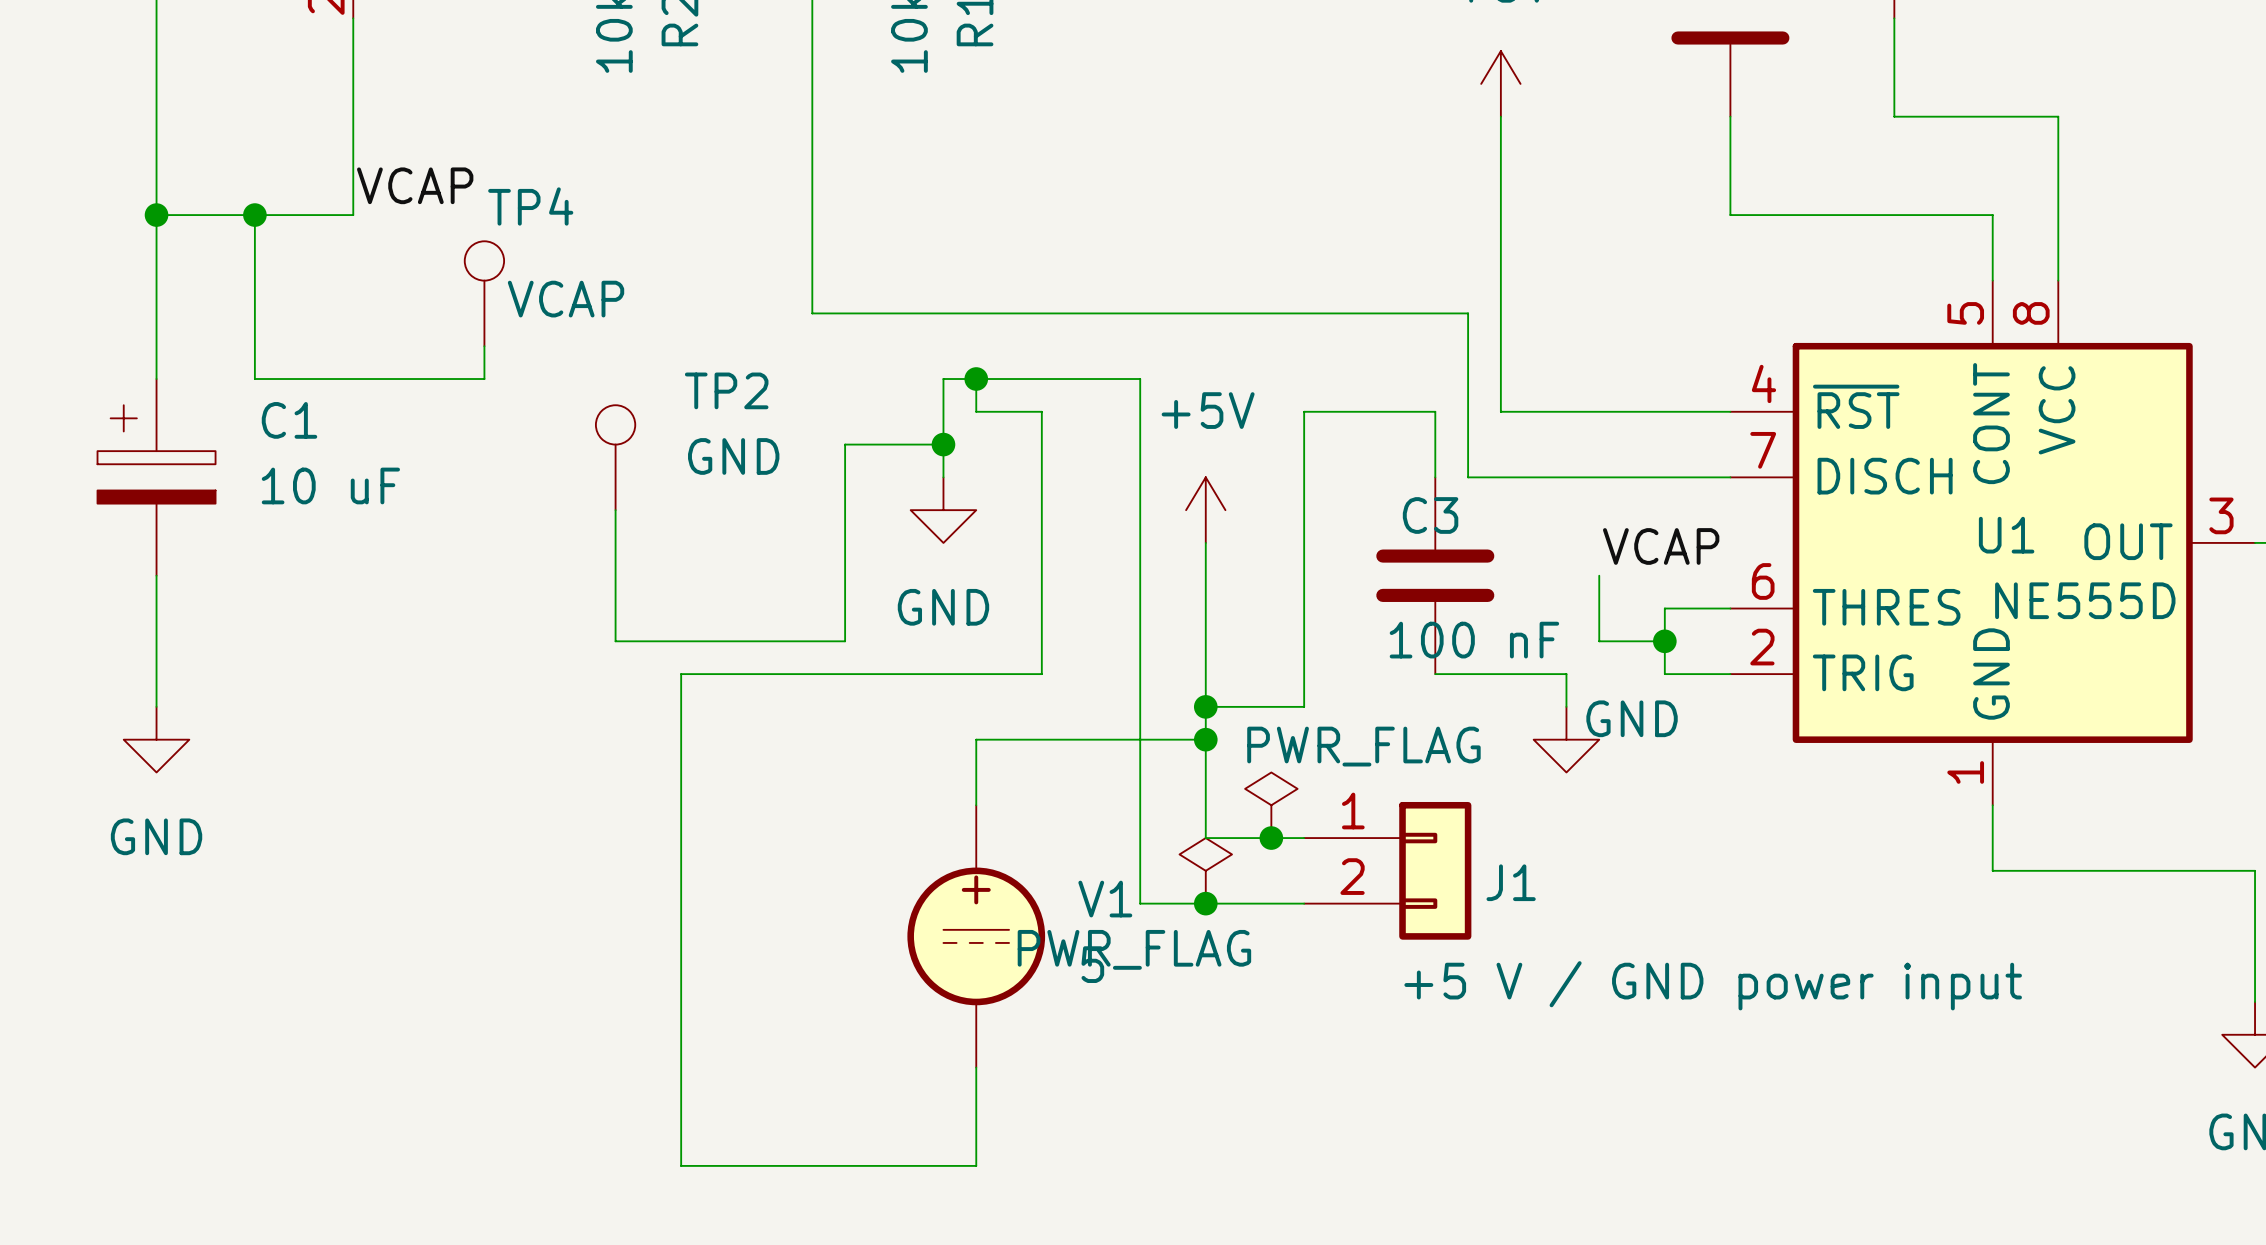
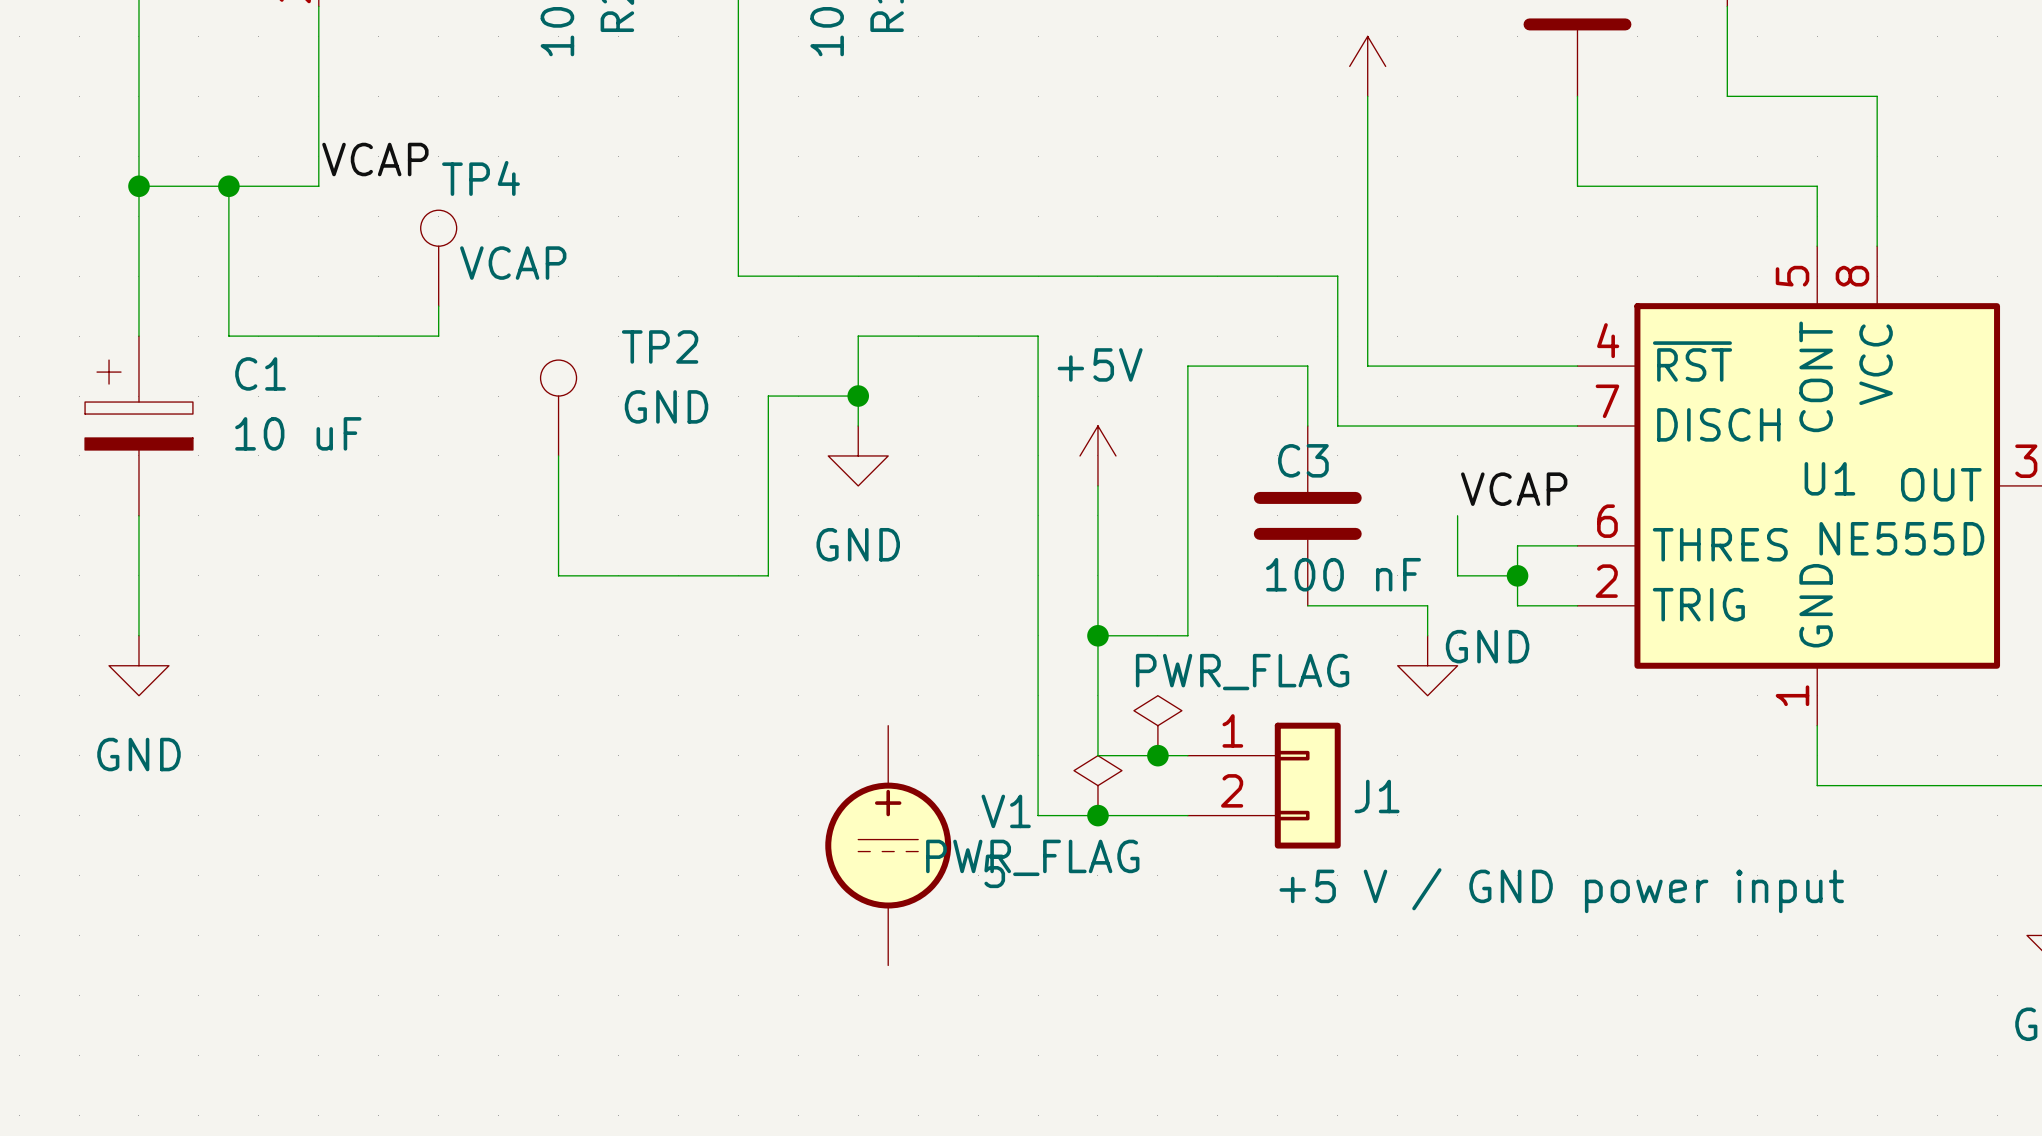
wire: (976, 379) (976, 411) (1041, 411) (1041, 674) (681, 674) (681, 1165) (976, 1165) (976, 1067) -> none
junction: (976, 379) -> none
wire: (1205, 739) (976, 739) (976, 805) -> none
junction: (1205, 739) -> none

